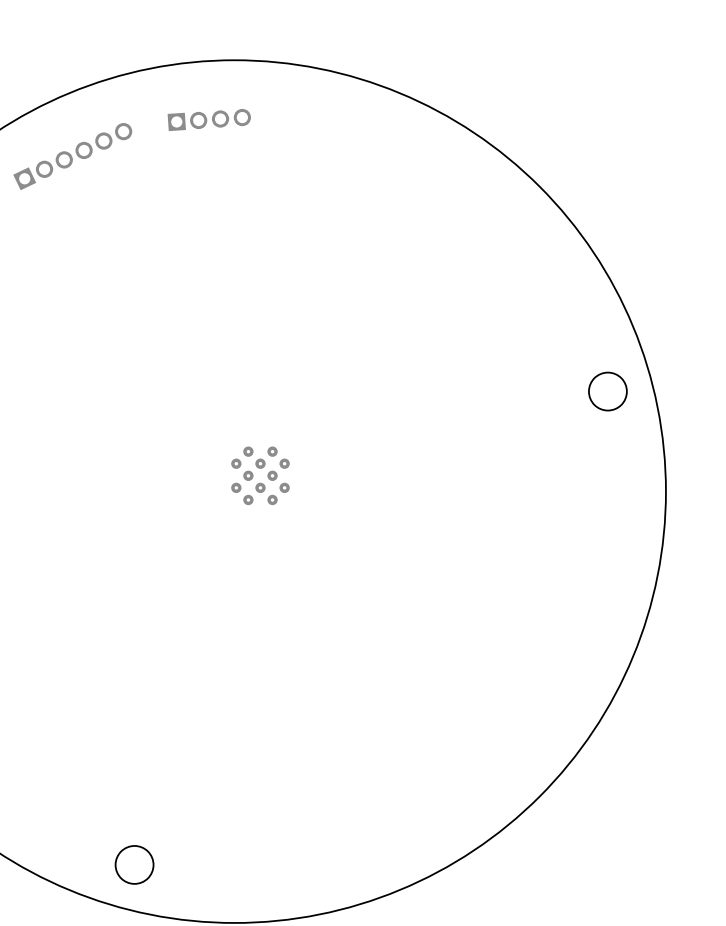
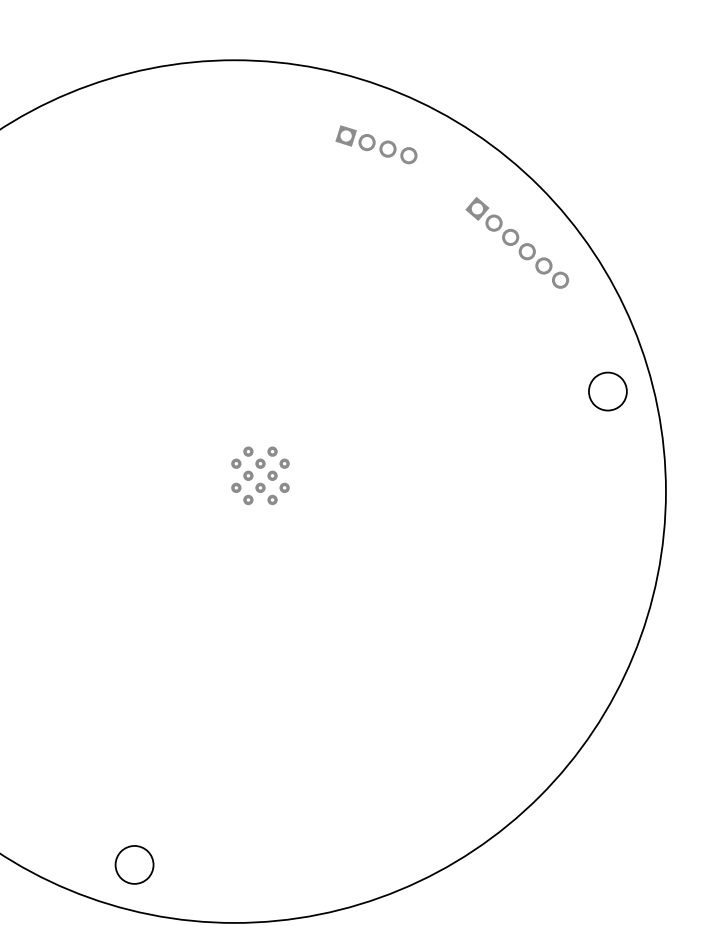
part: (209, 120) -> none
part: none -> (376, 144)
part: (72, 156) -> none
part: none -> (517, 242)

